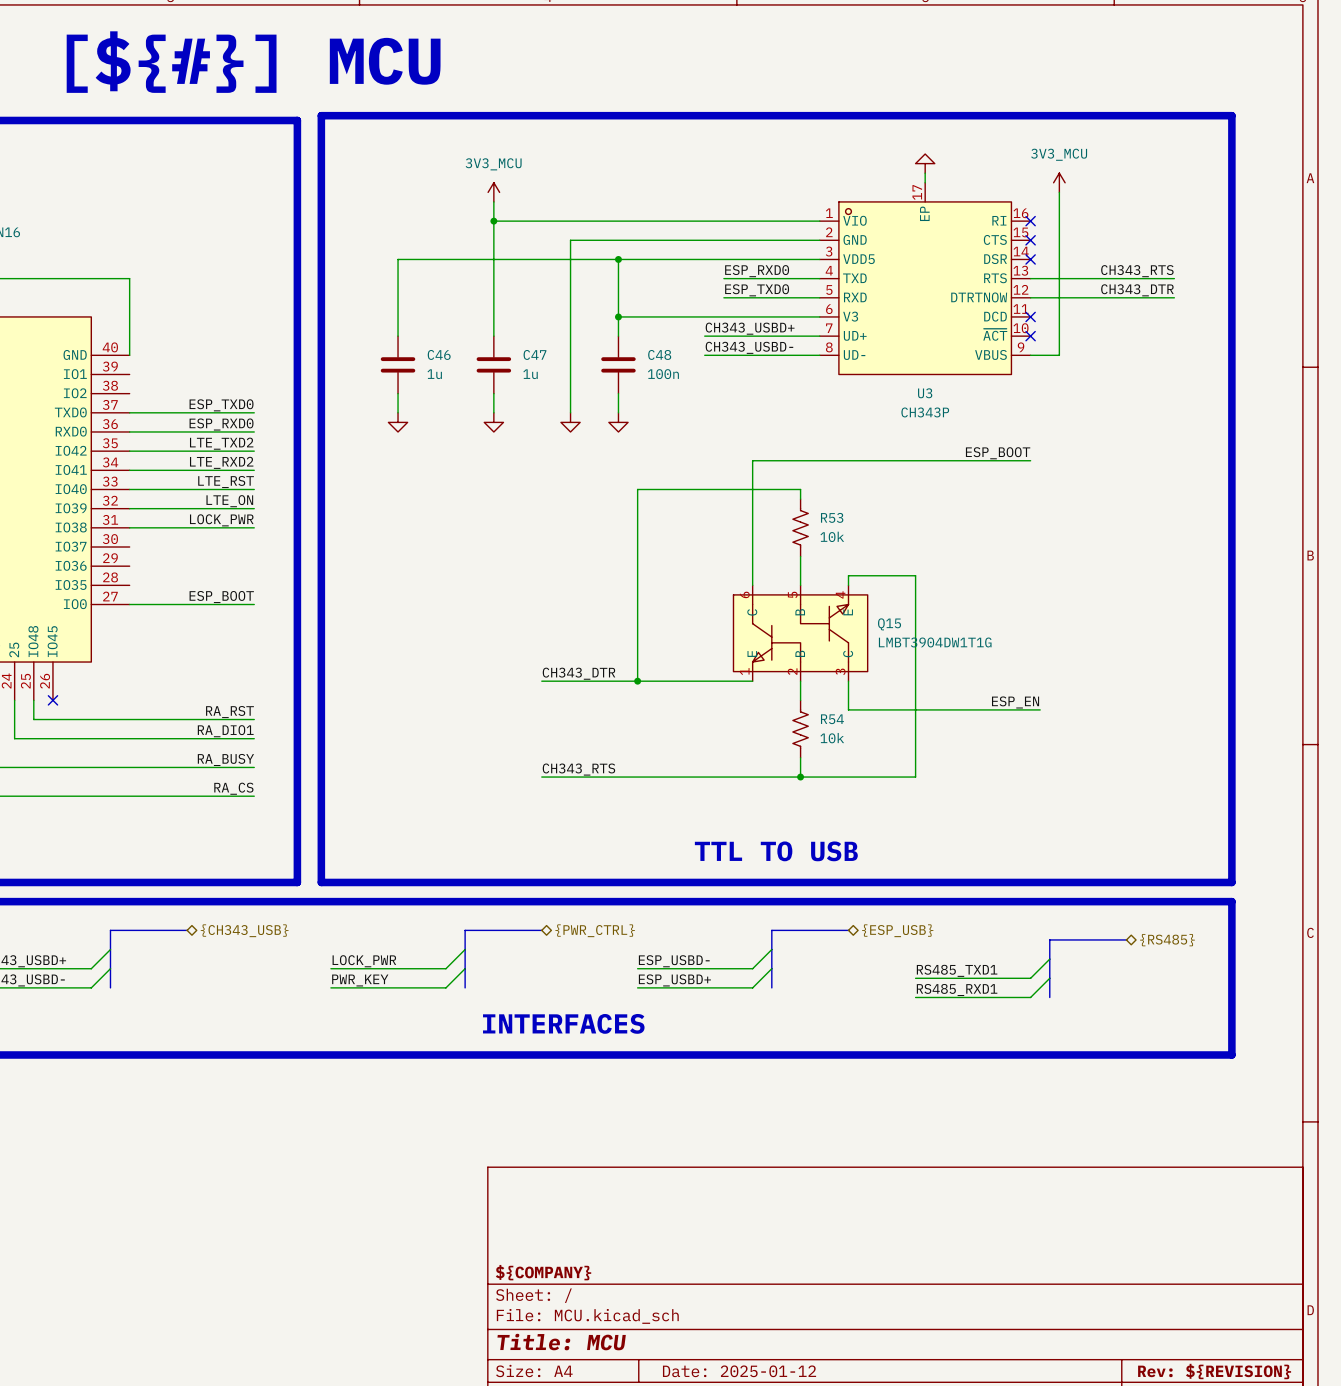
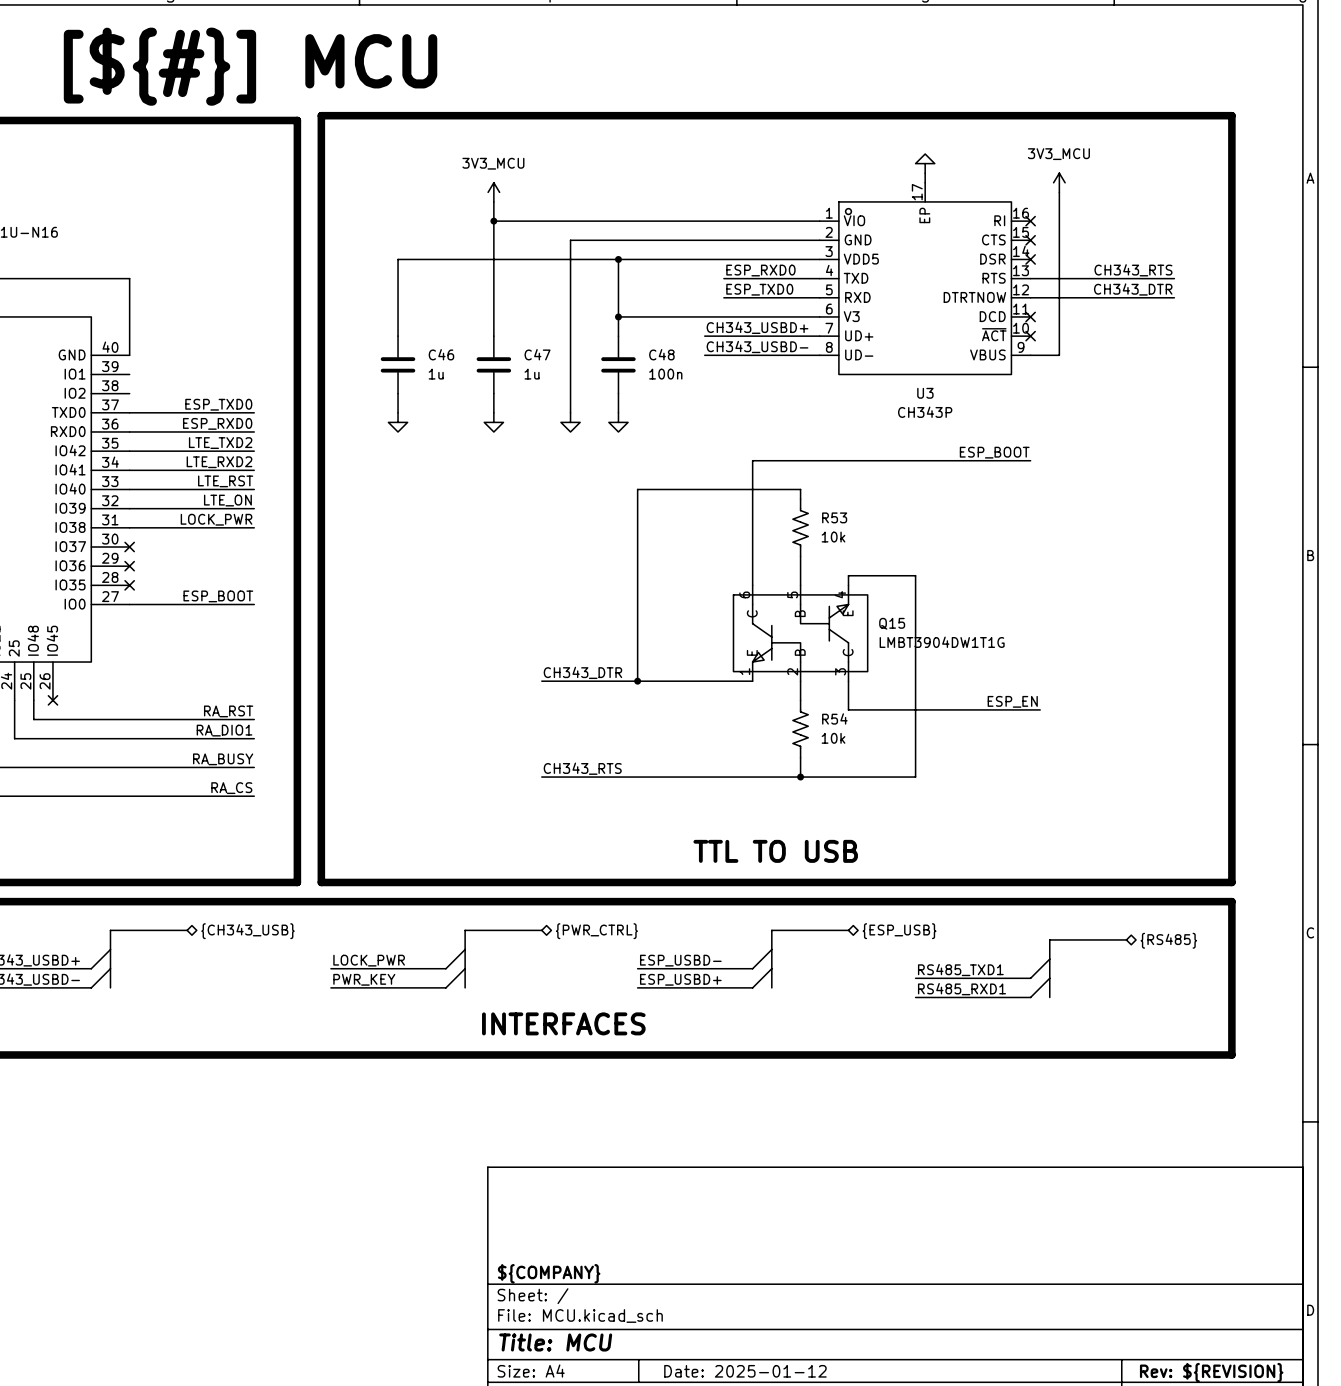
no-connect mark: none -> (129, 547)
no-connect mark: none -> (129, 566)
no-connect mark: none -> (129, 585)

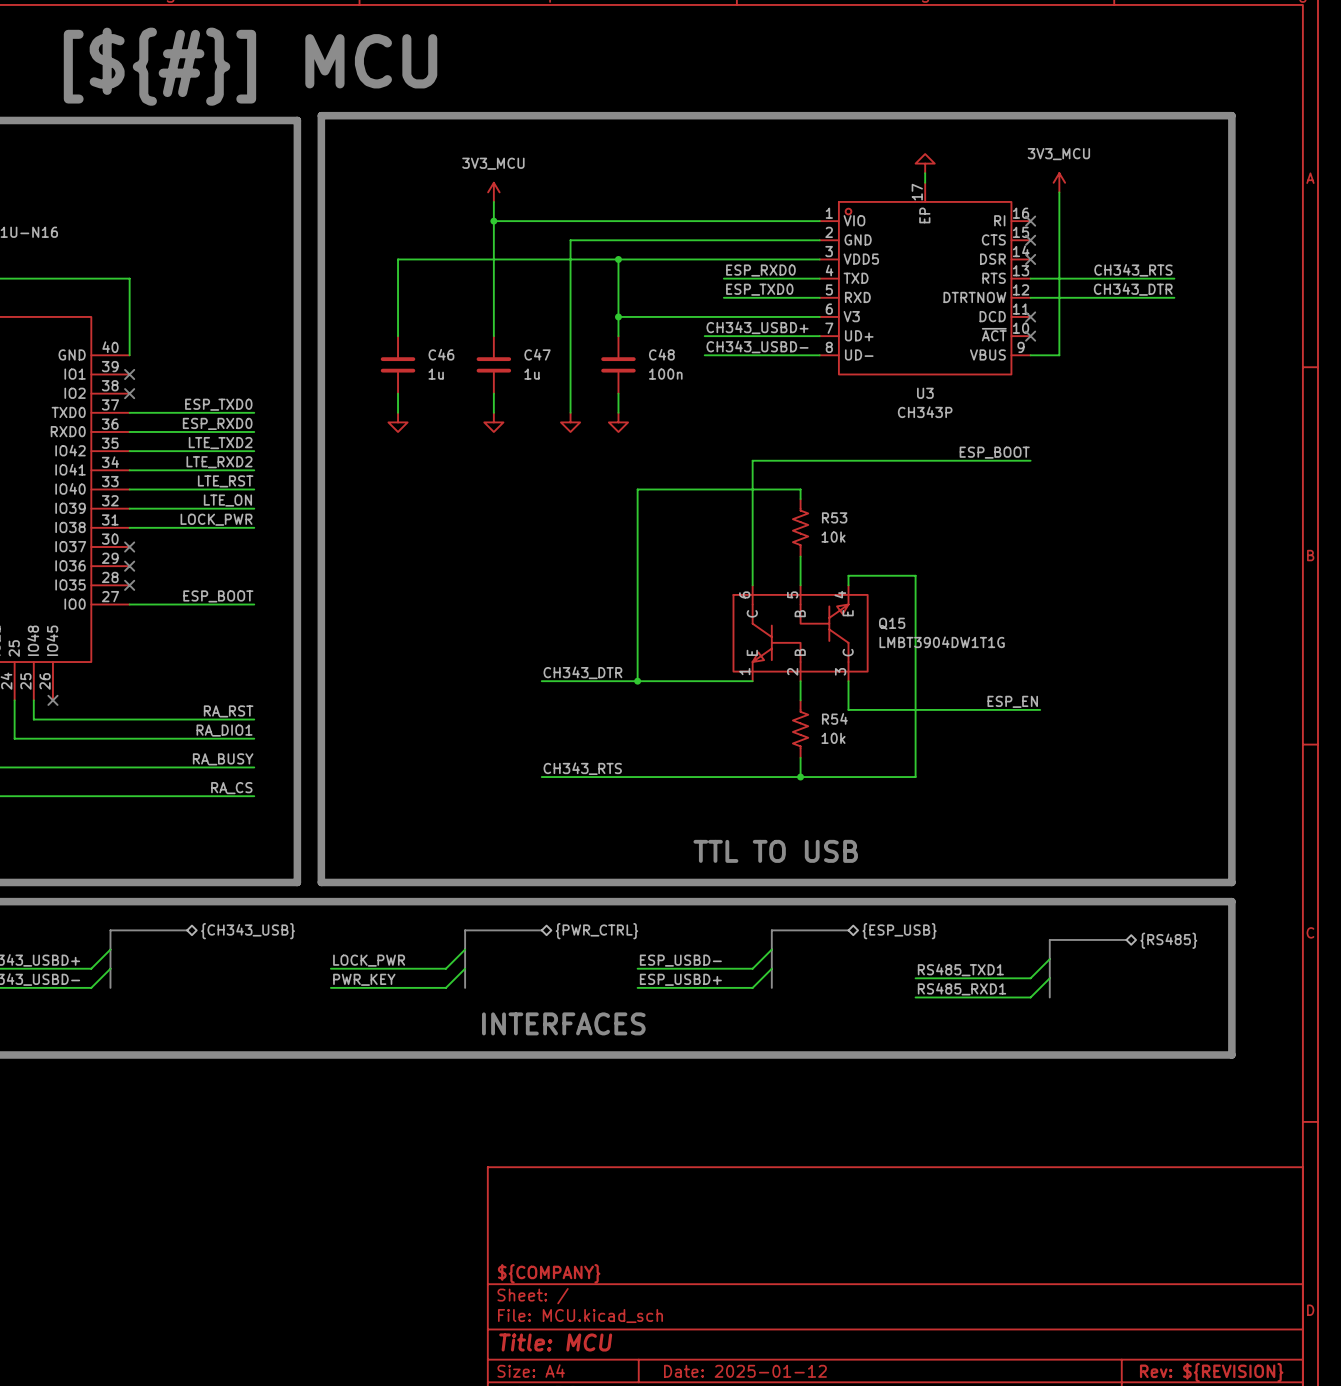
no-connect mark: none -> (129, 374)
no-connect mark: none -> (129, 393)

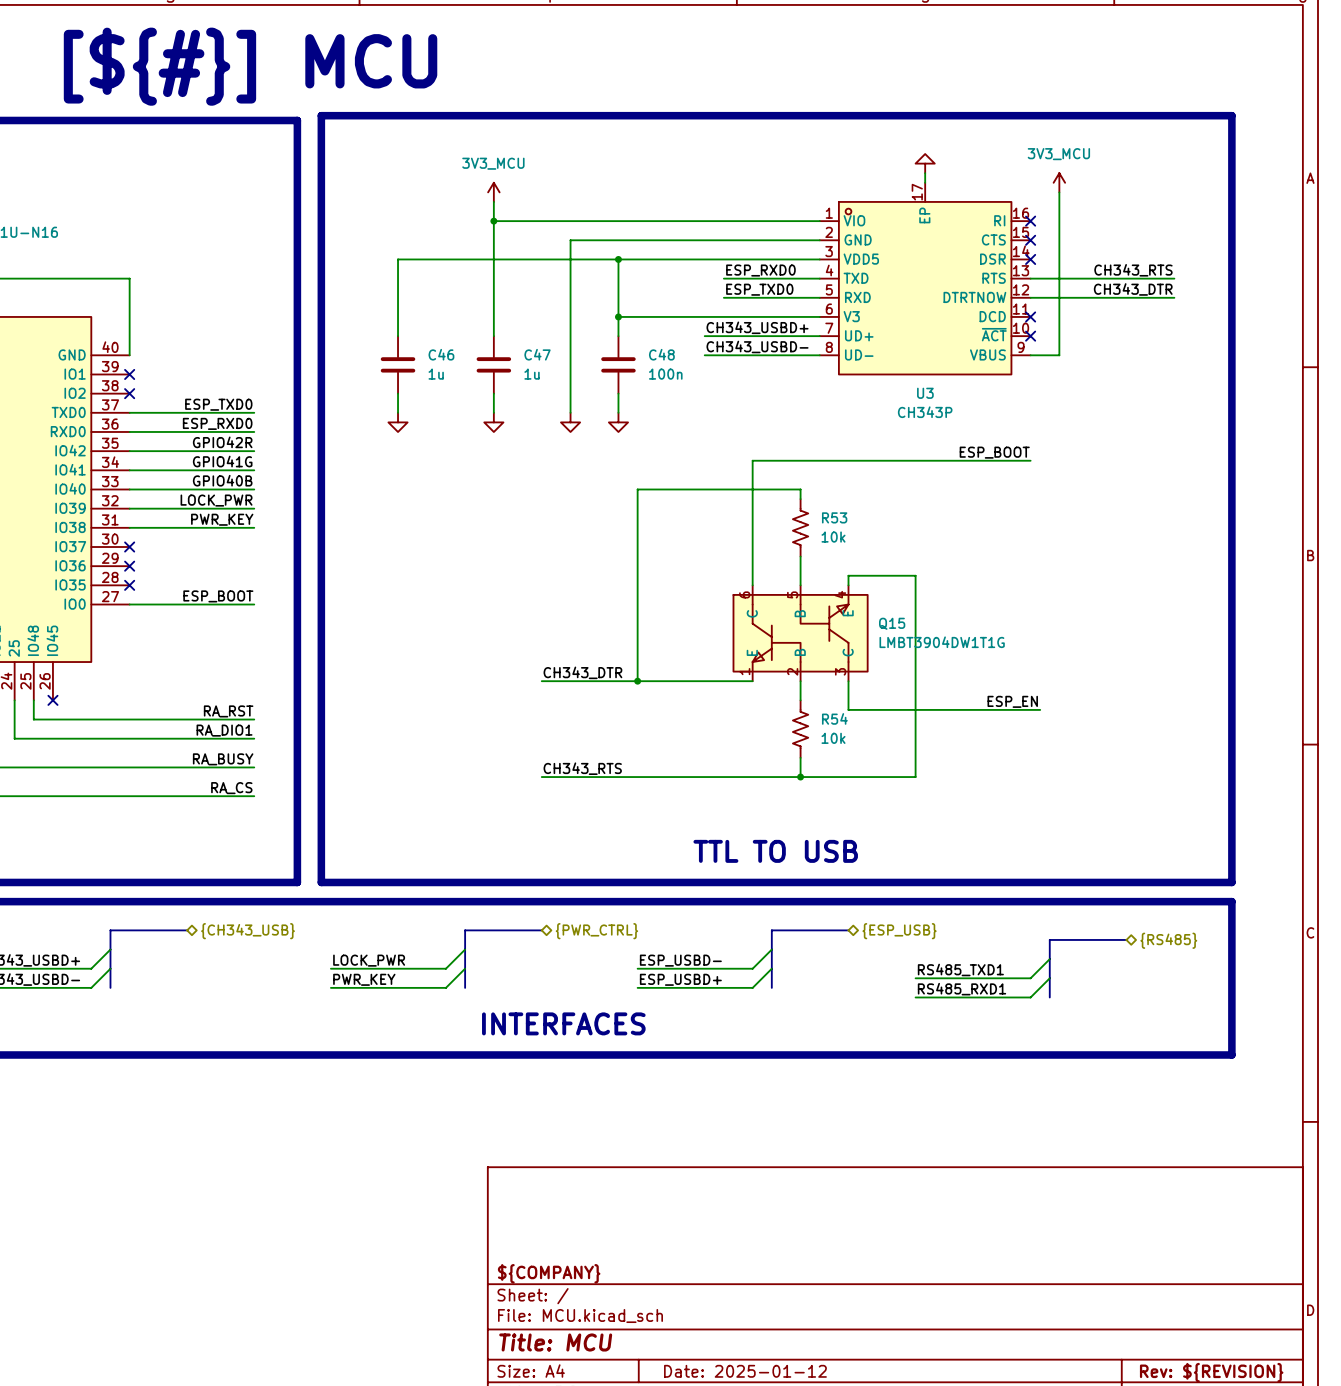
label: LTE_TXD2 (220, 443) -> GPIO42R (222, 442)
label: LTE_RXD2 (219, 462) -> GPIO41G (222, 461)
label: LTE_RST (225, 481) -> GPIO40B (222, 480)
label: LTE_ON (227, 500) -> LOCK_PWR (216, 500)
label: LOCK_PWR (216, 519) -> PWR_KEY (222, 519)

